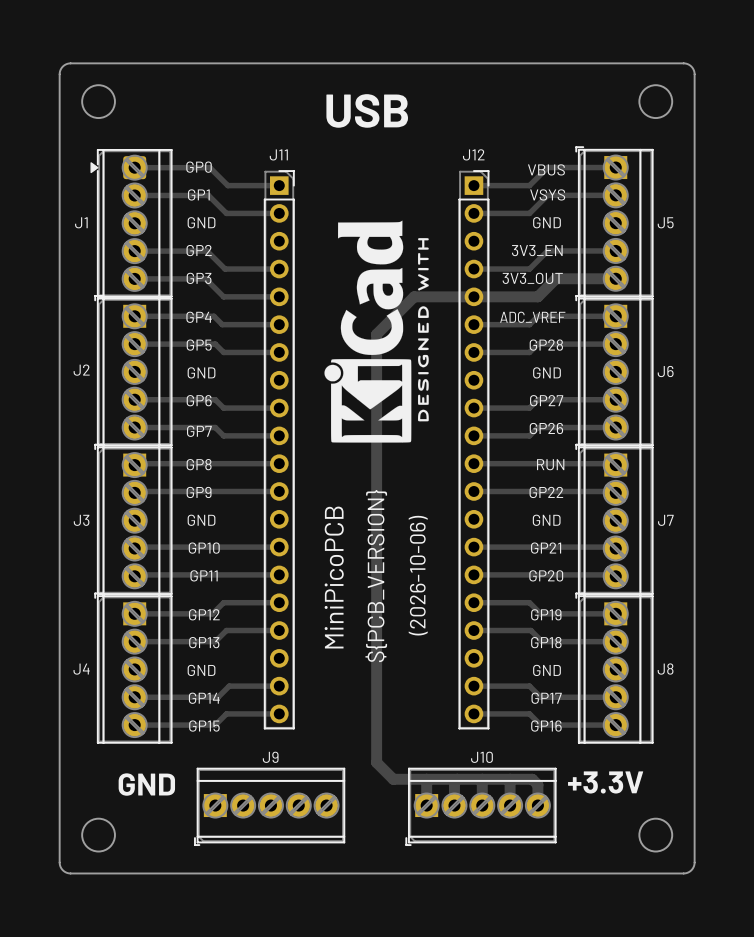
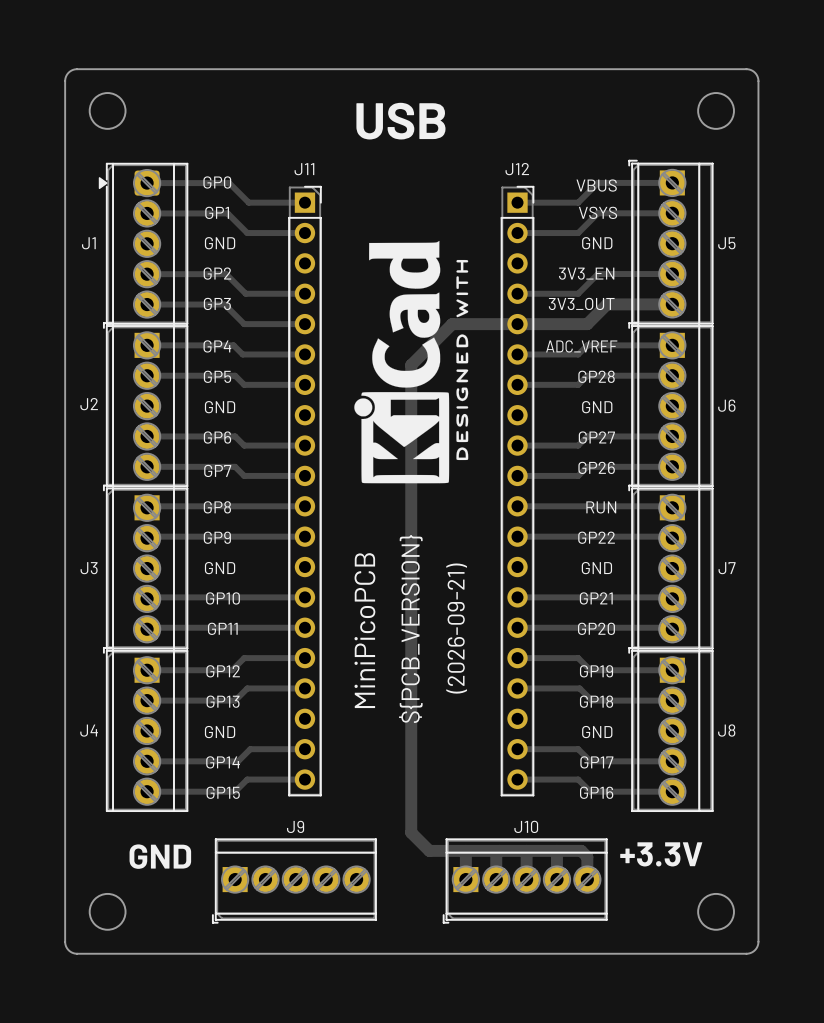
text: (2026-10-06) (418, 575) -> (2026-09-21) (456, 628)

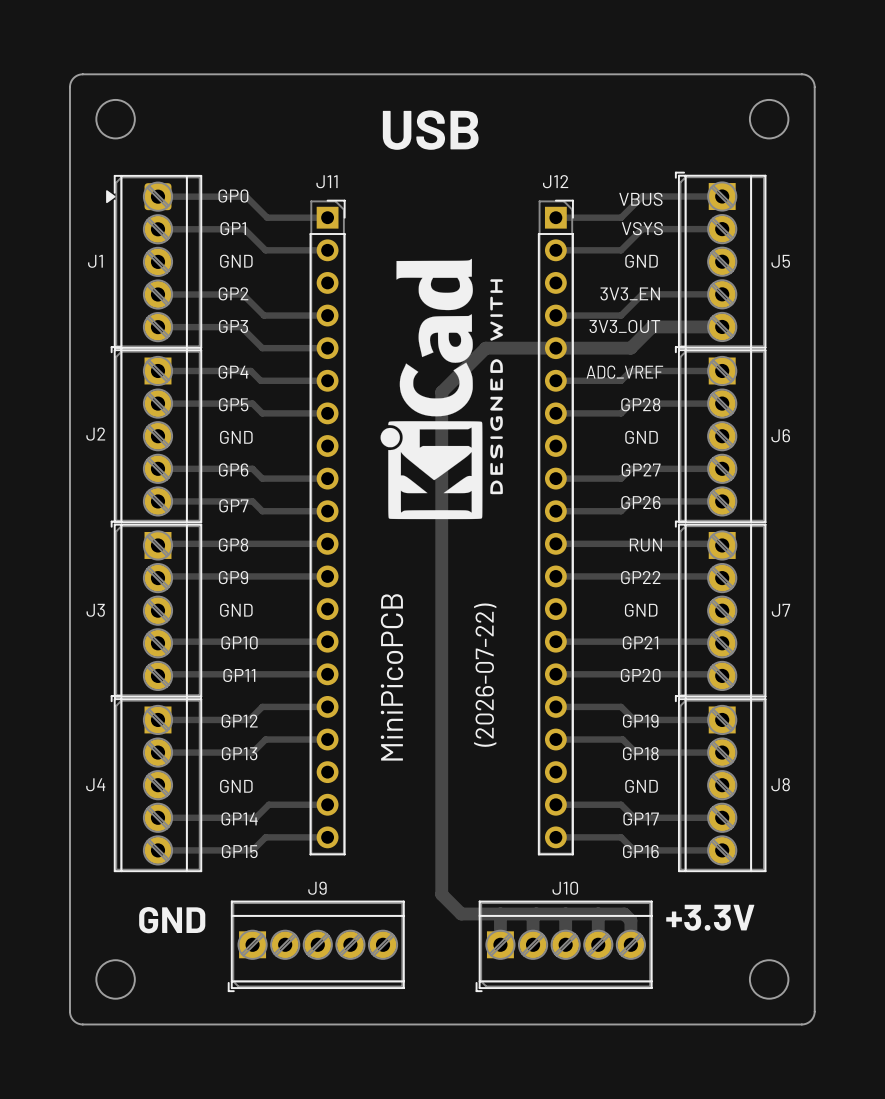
text: ${PCB_VERSION} (410, 628) -> none
text: (2026-09-21) (456, 628) -> (2026-07-22) (485, 675)

